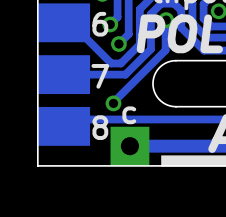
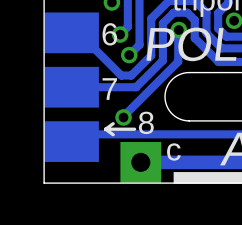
line: none -> (113, 123) (105, 129)
line: none -> (105, 129) (113, 134)
line: none -> (134, 129) (105, 129)
text position: c (129, 115) -> c (173, 151)
text position: 8 (100, 127) -> 8 (146, 122)

